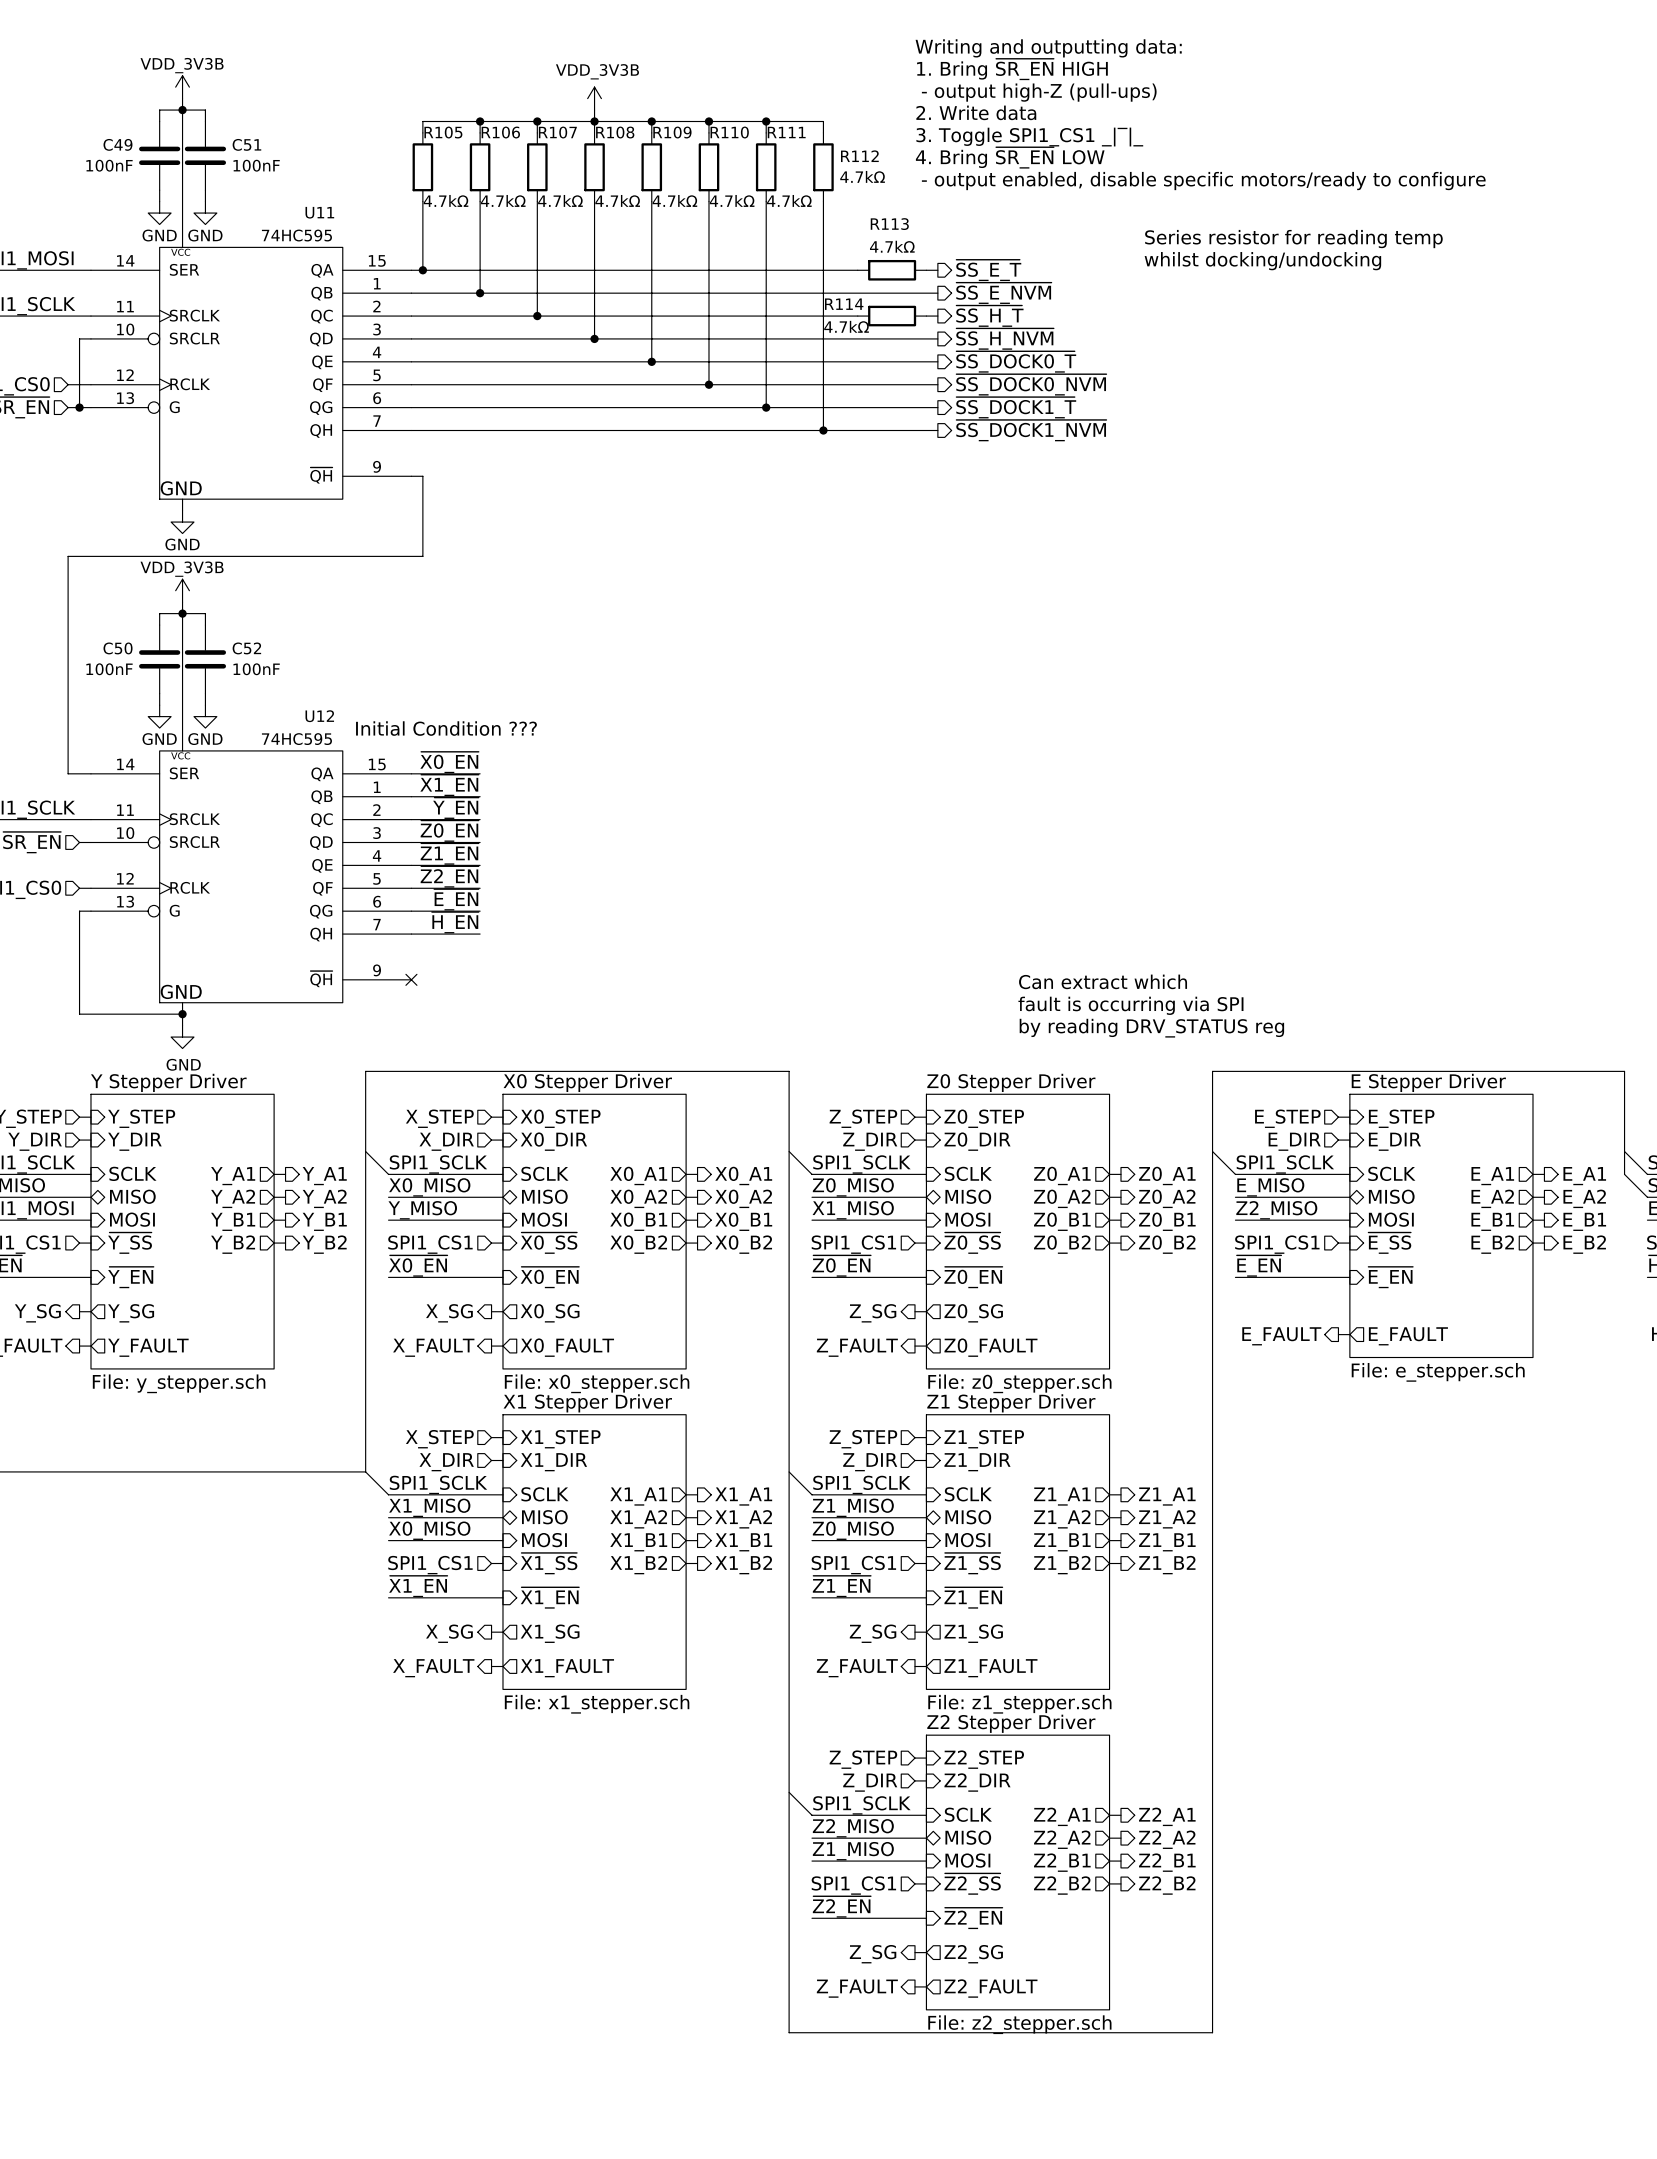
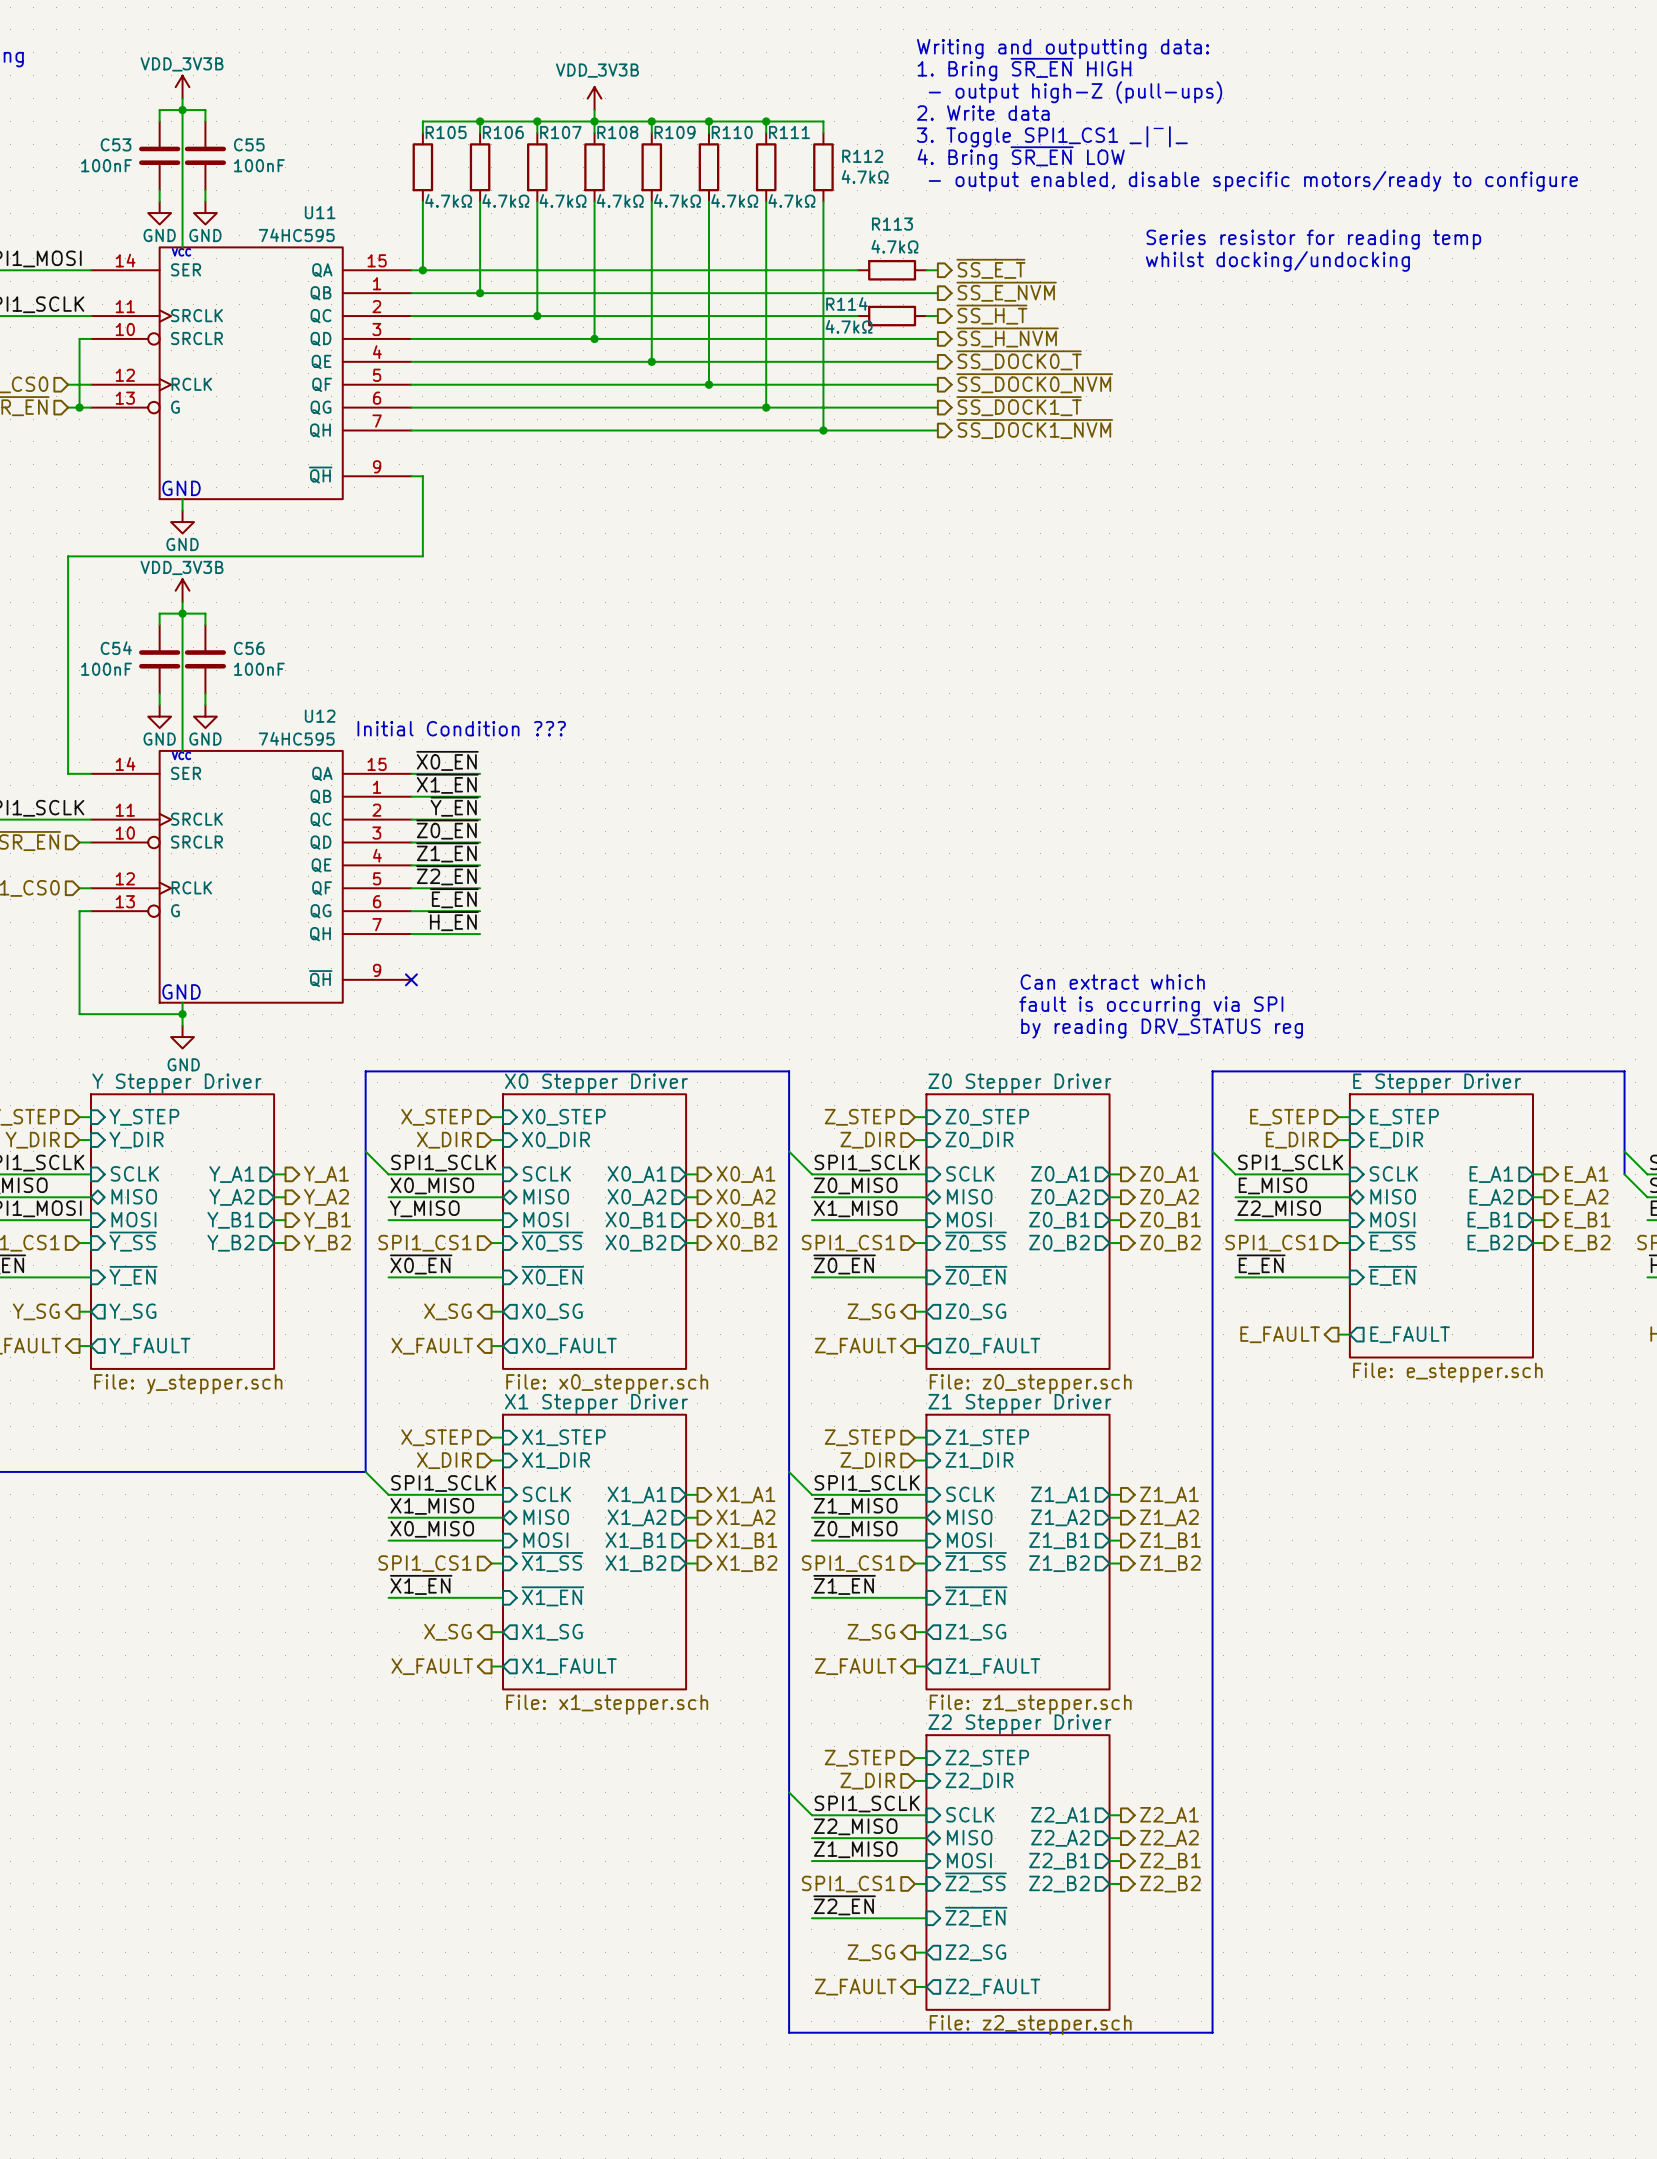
C49 name: C49 (117, 144) -> C53 (116, 144)
C51 name: C51 (246, 144) -> C55 (249, 144)
C50 name: C50 (118, 648) -> C54 (116, 648)
C52 name: C52 (246, 648) -> C56 (249, 648)

